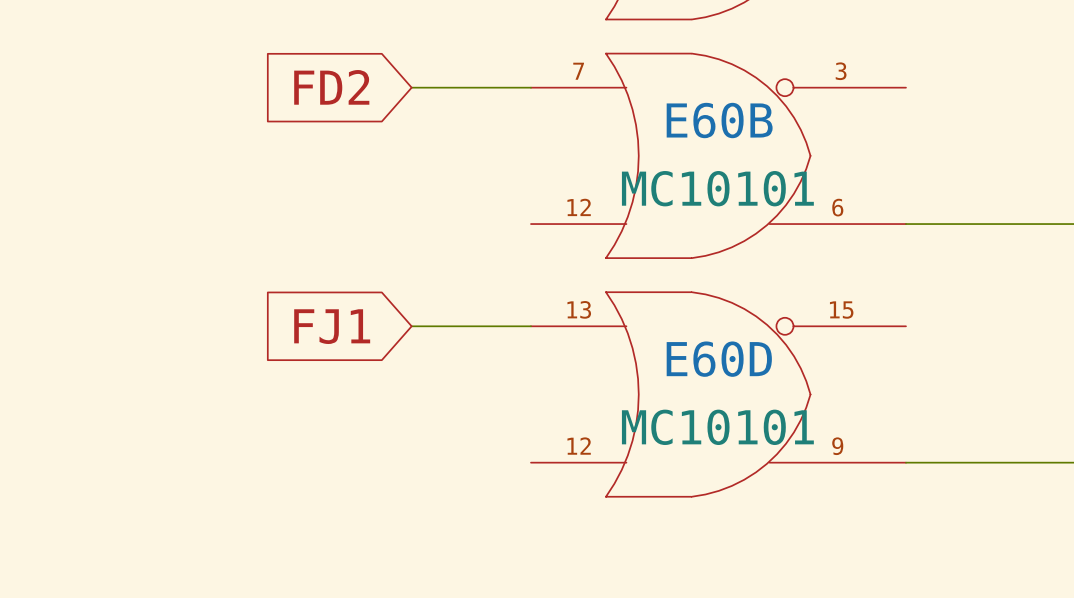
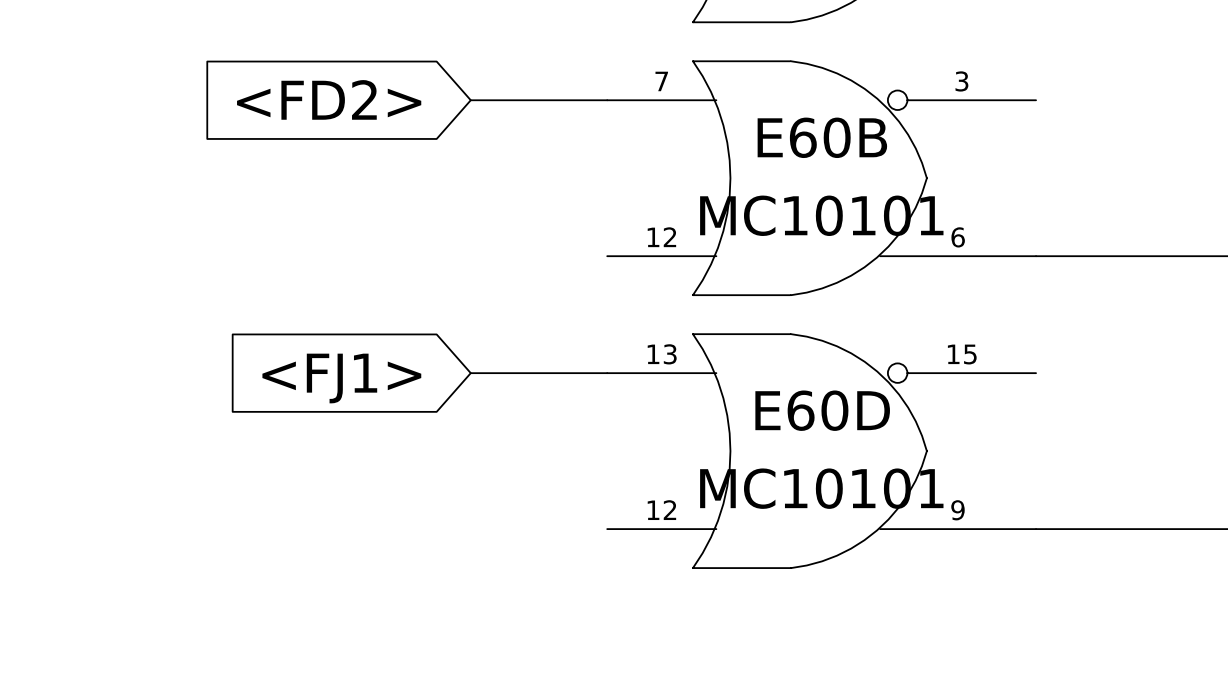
global label: FD2 (331, 87) -> <FD2> (329, 99)
global label: FJ1 (332, 326) -> <FJ1> (341, 378)

